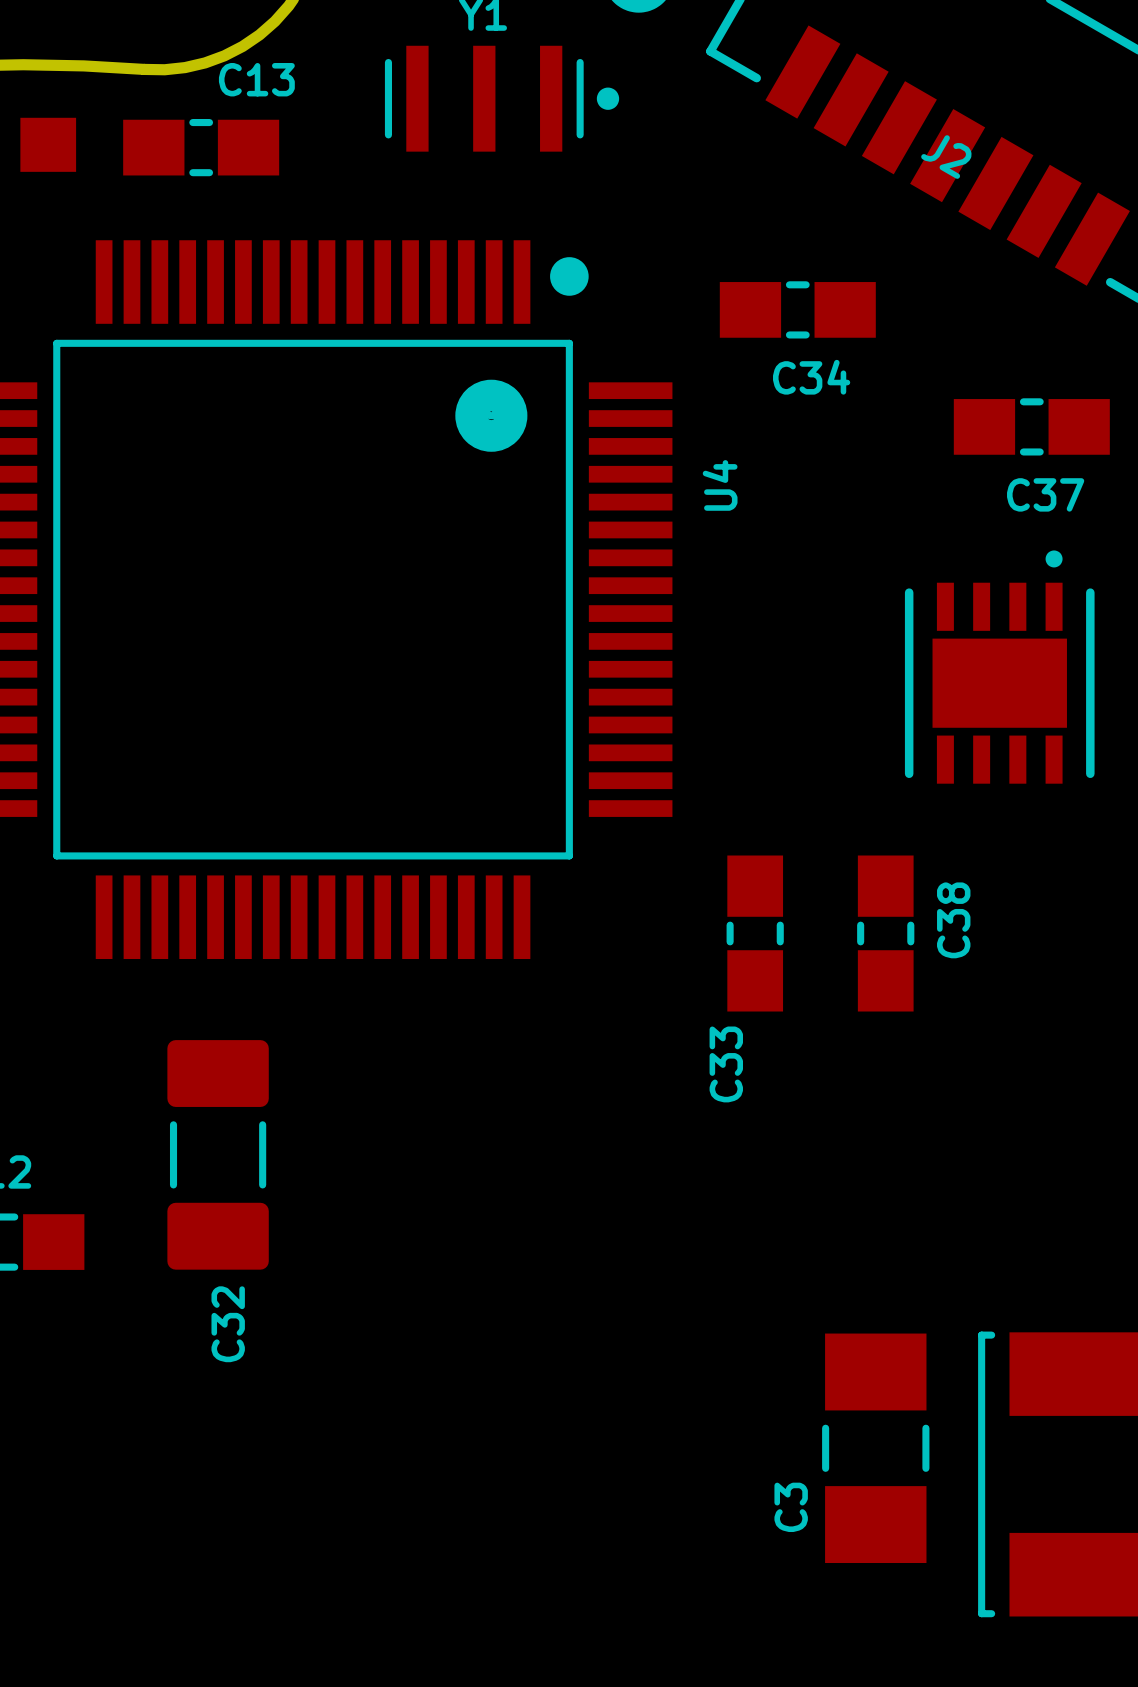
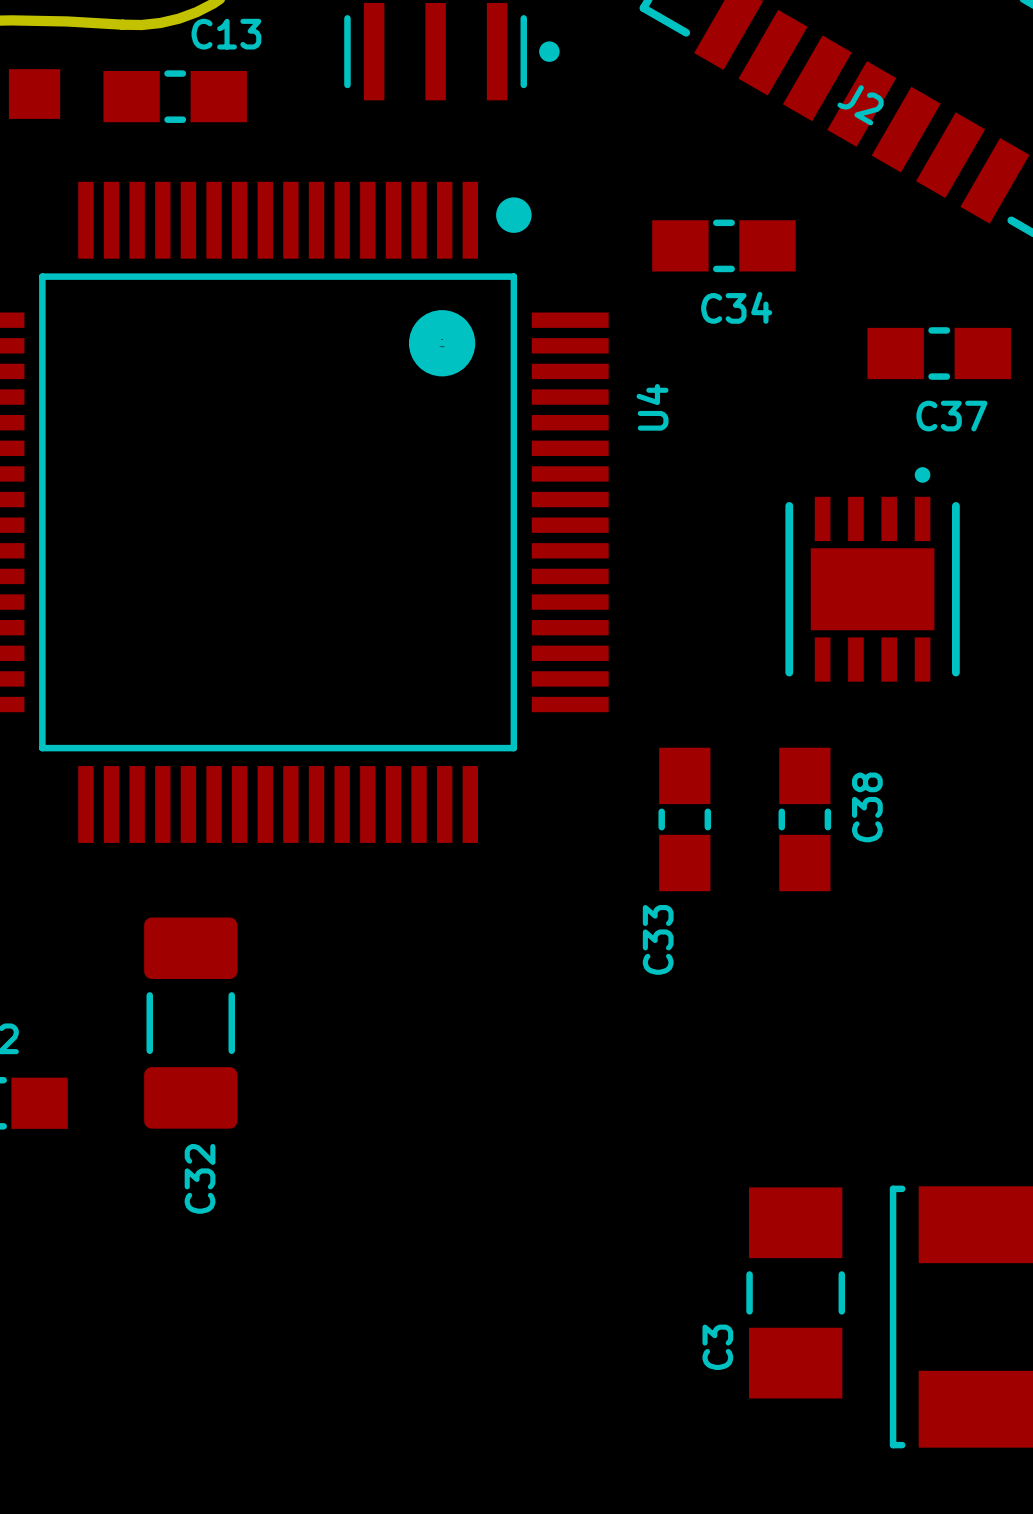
part position: (999, 667) -> (872, 574)

